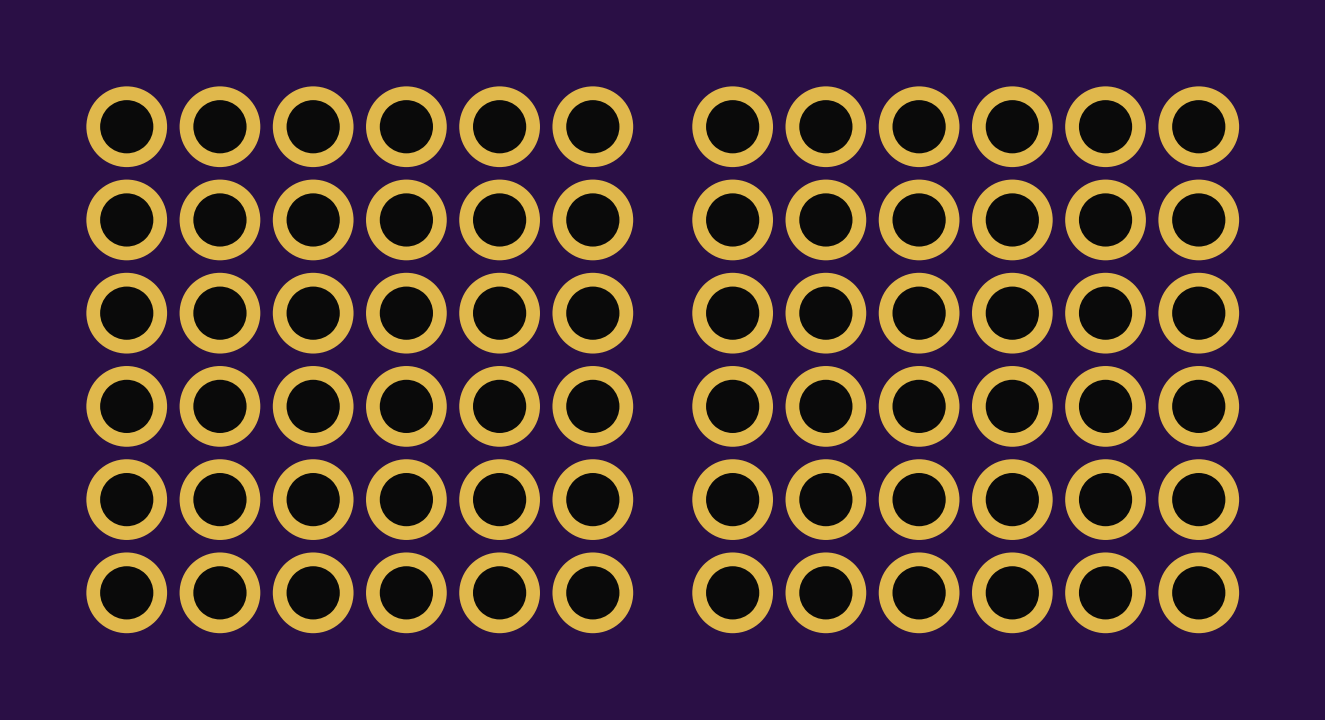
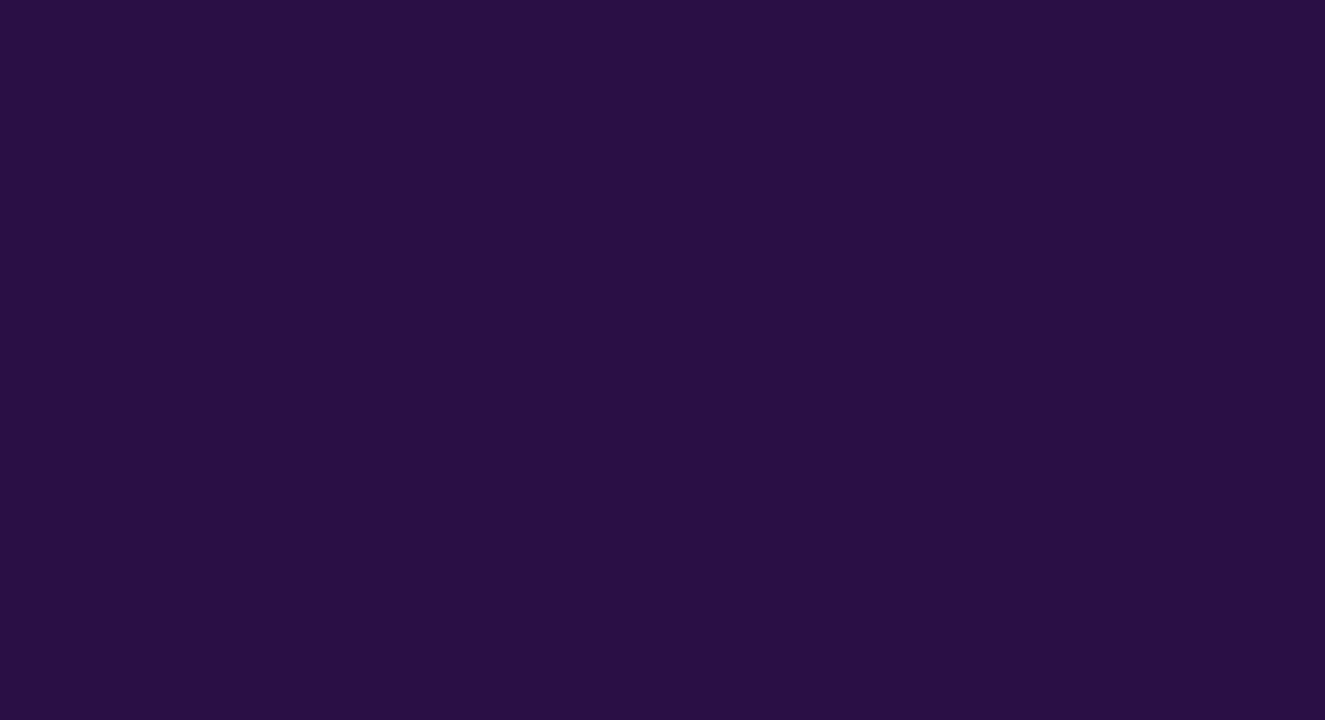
part: (359, 359) -> none
part: (965, 359) -> none

